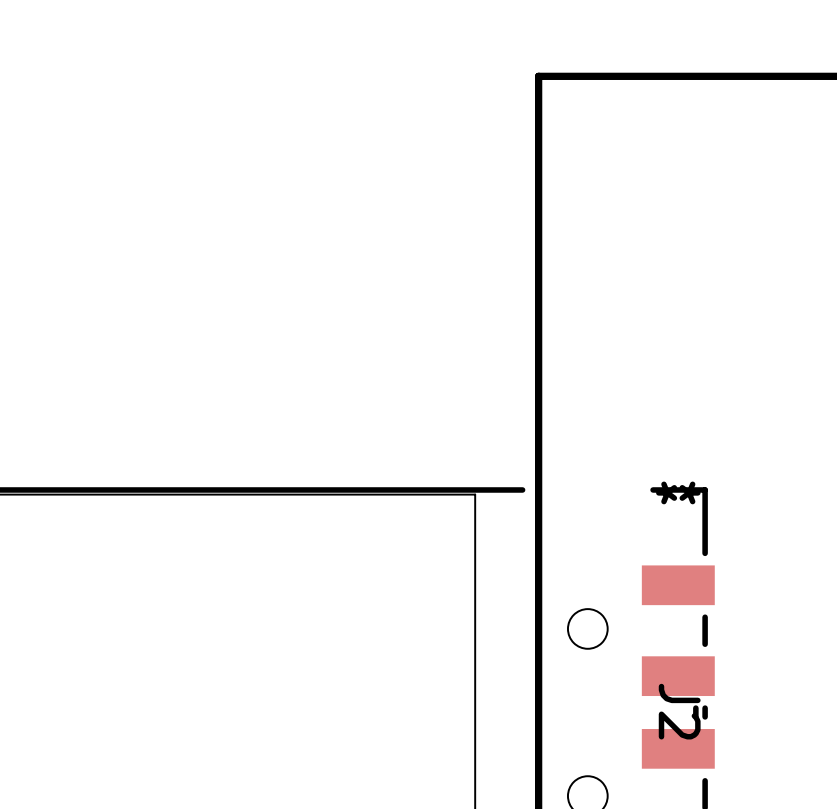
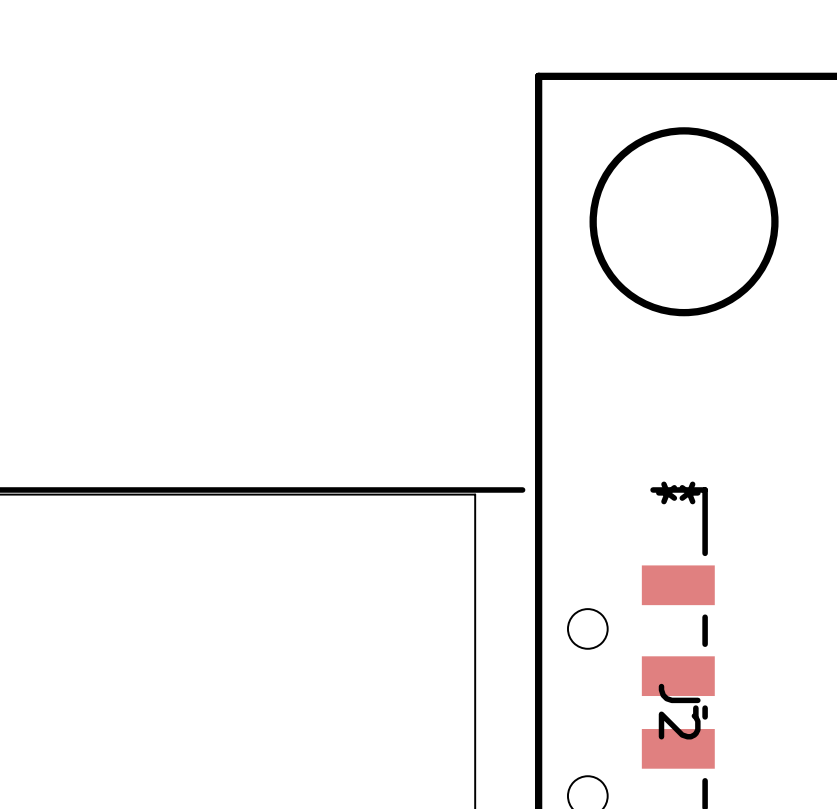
round board edge: none -> [589, 127, 779, 317]

